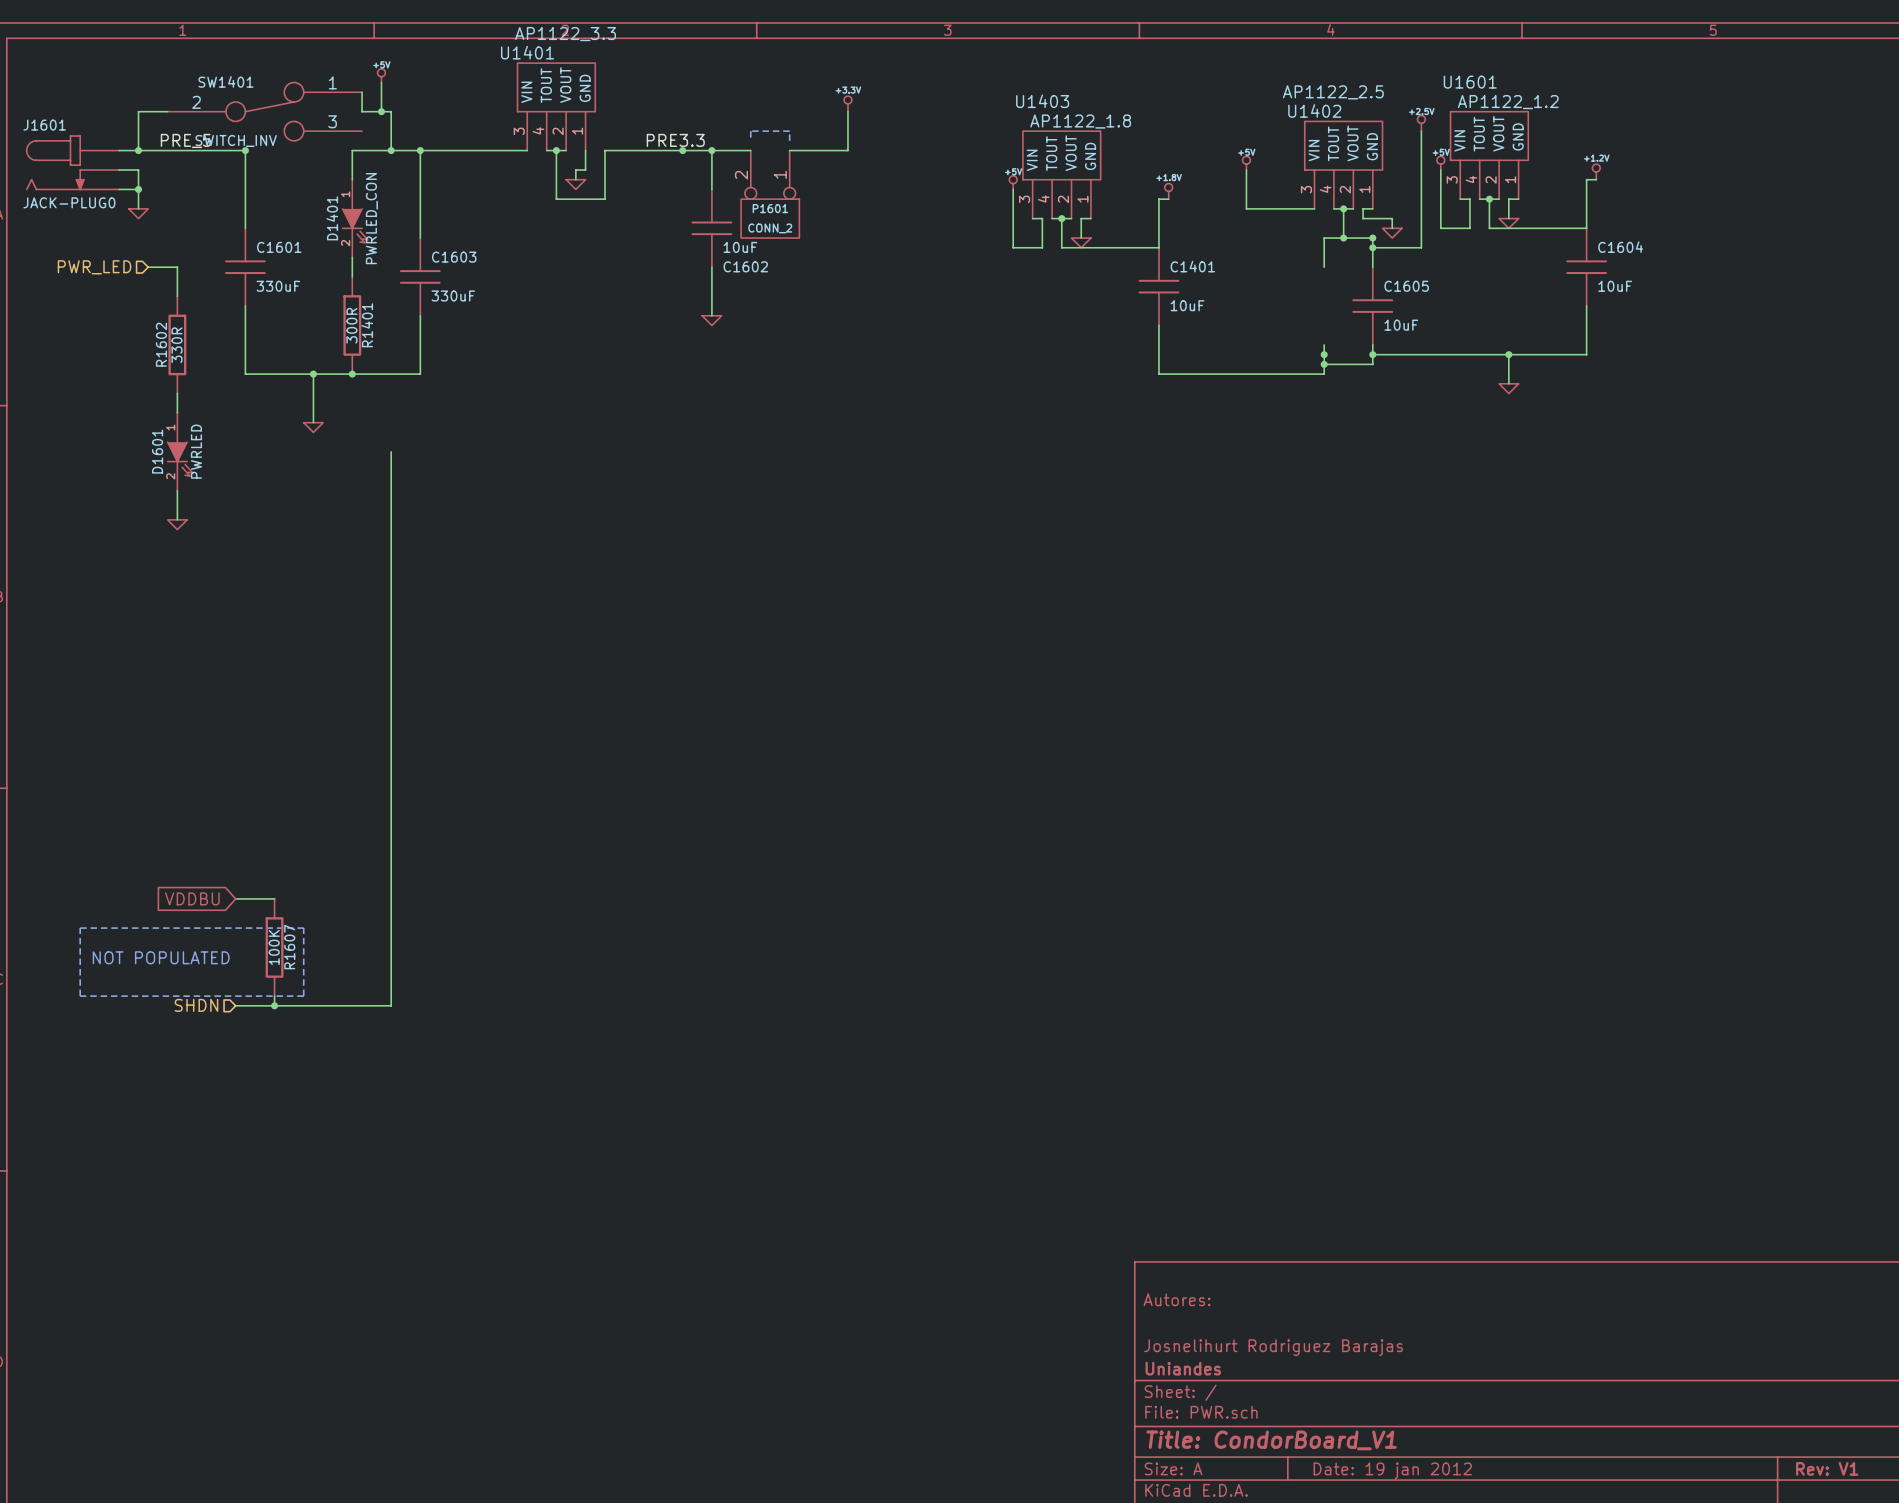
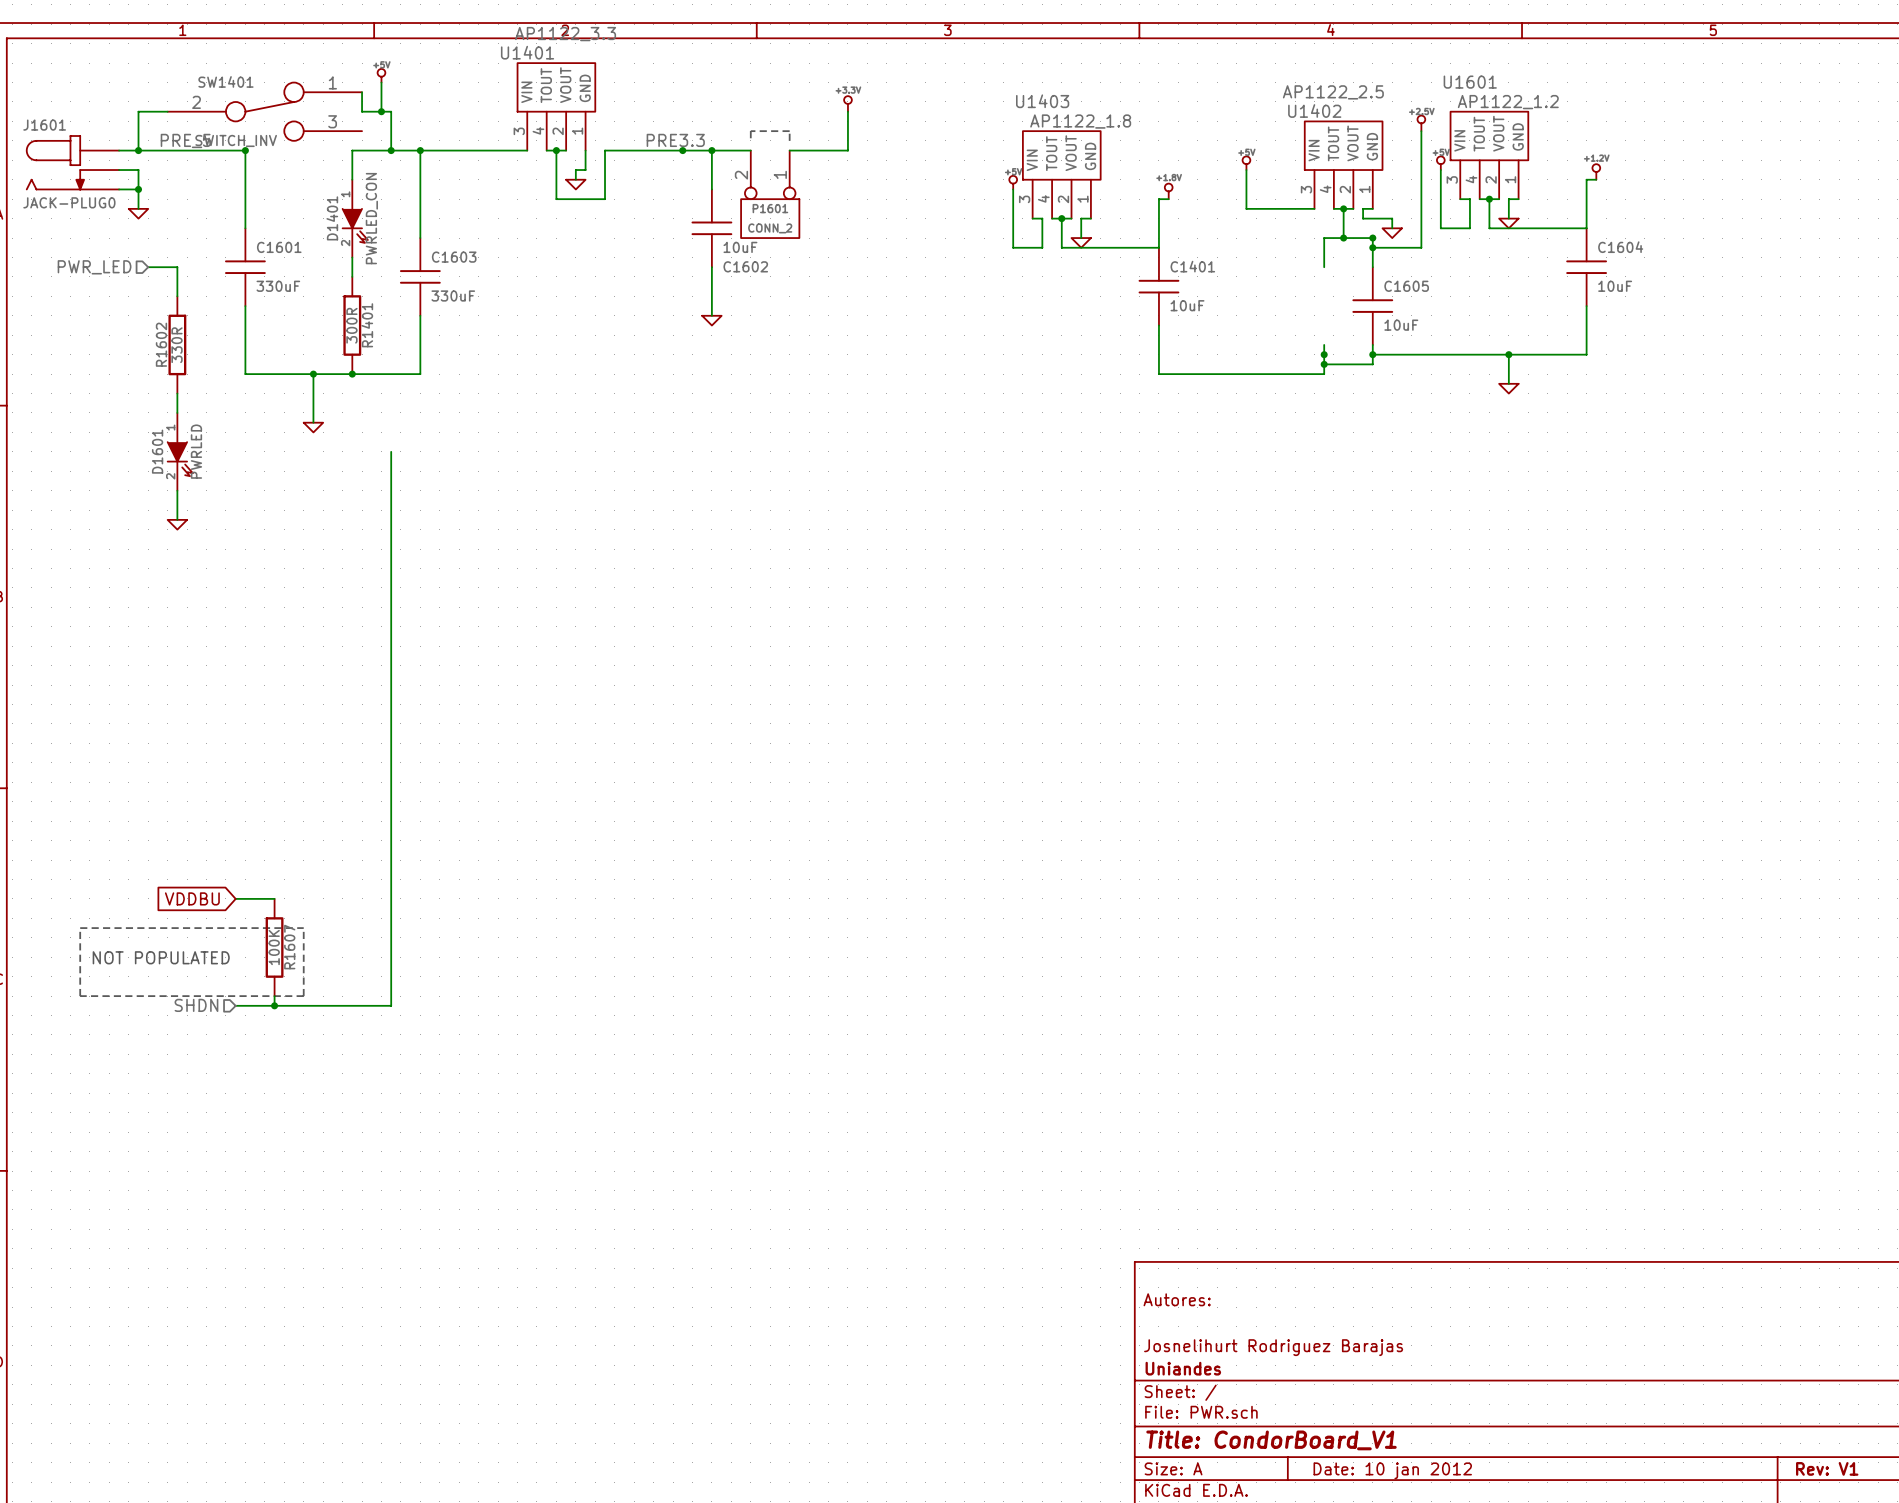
title block: Date: 19 jan 2012 (1392, 1470) -> Date: 10 jan 2012 (1392, 1470)

